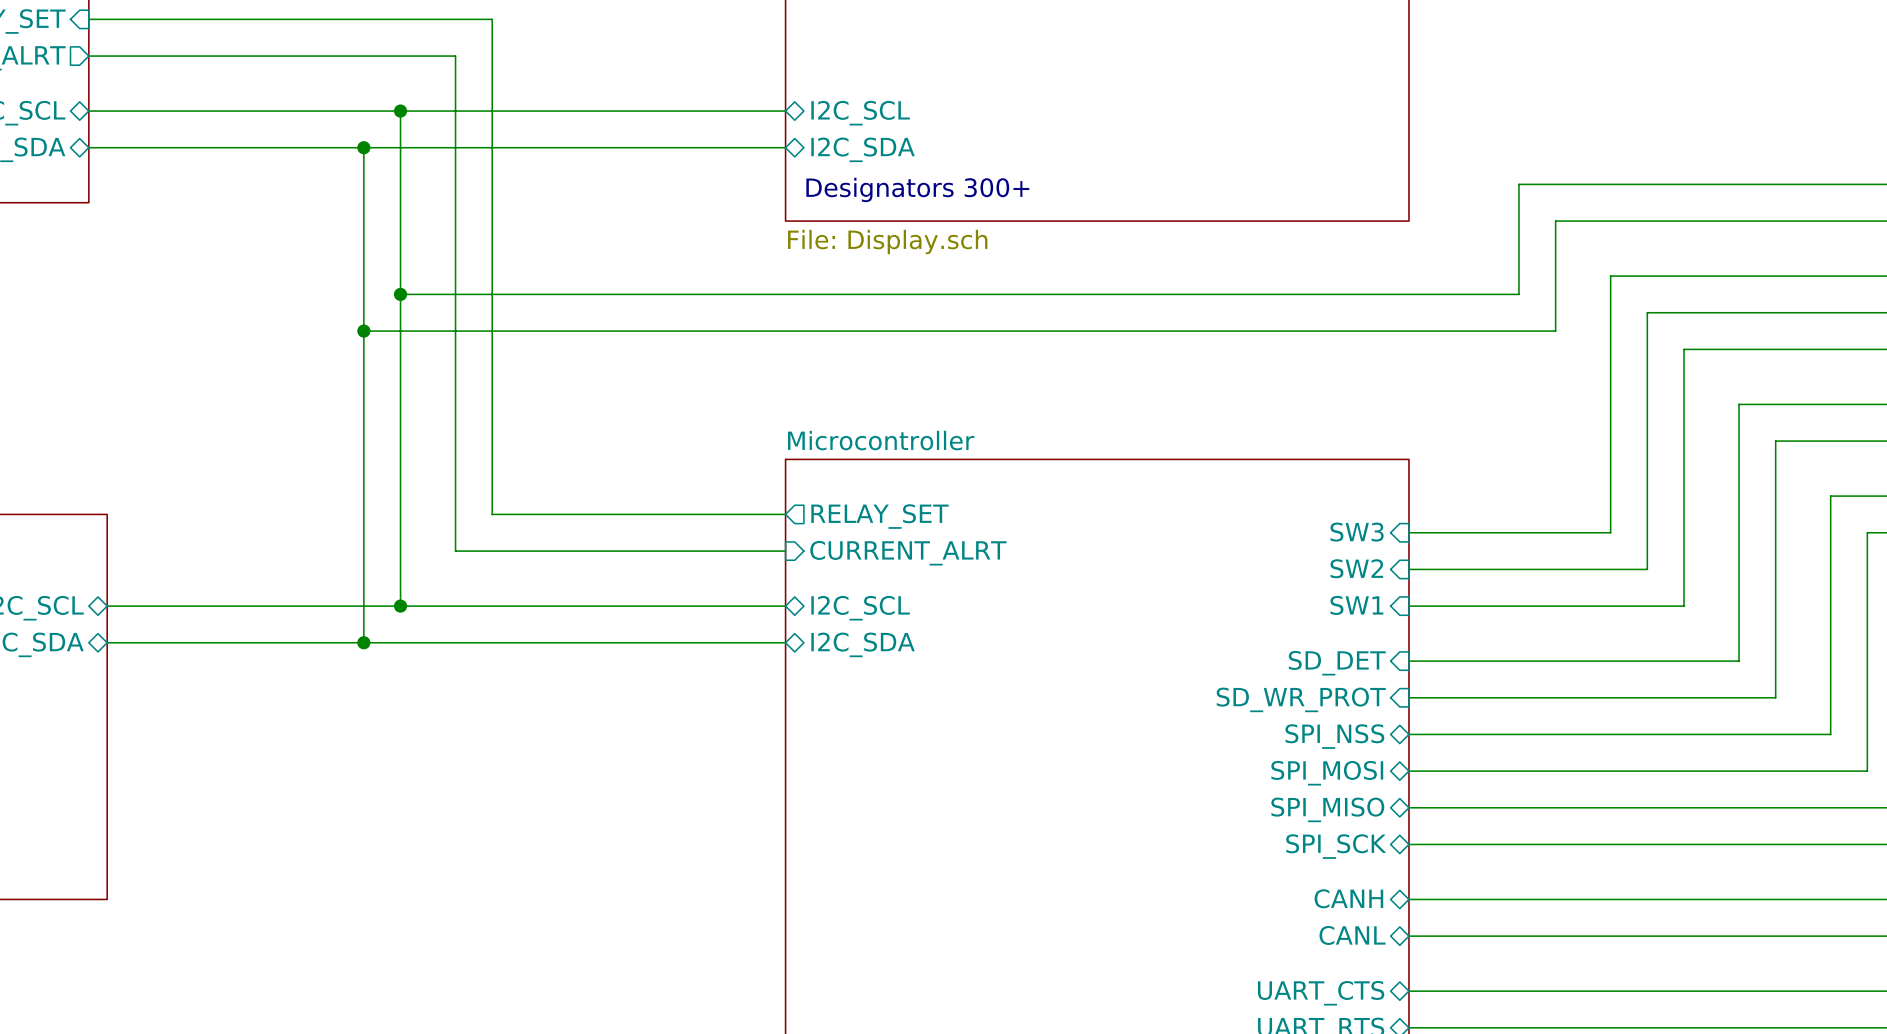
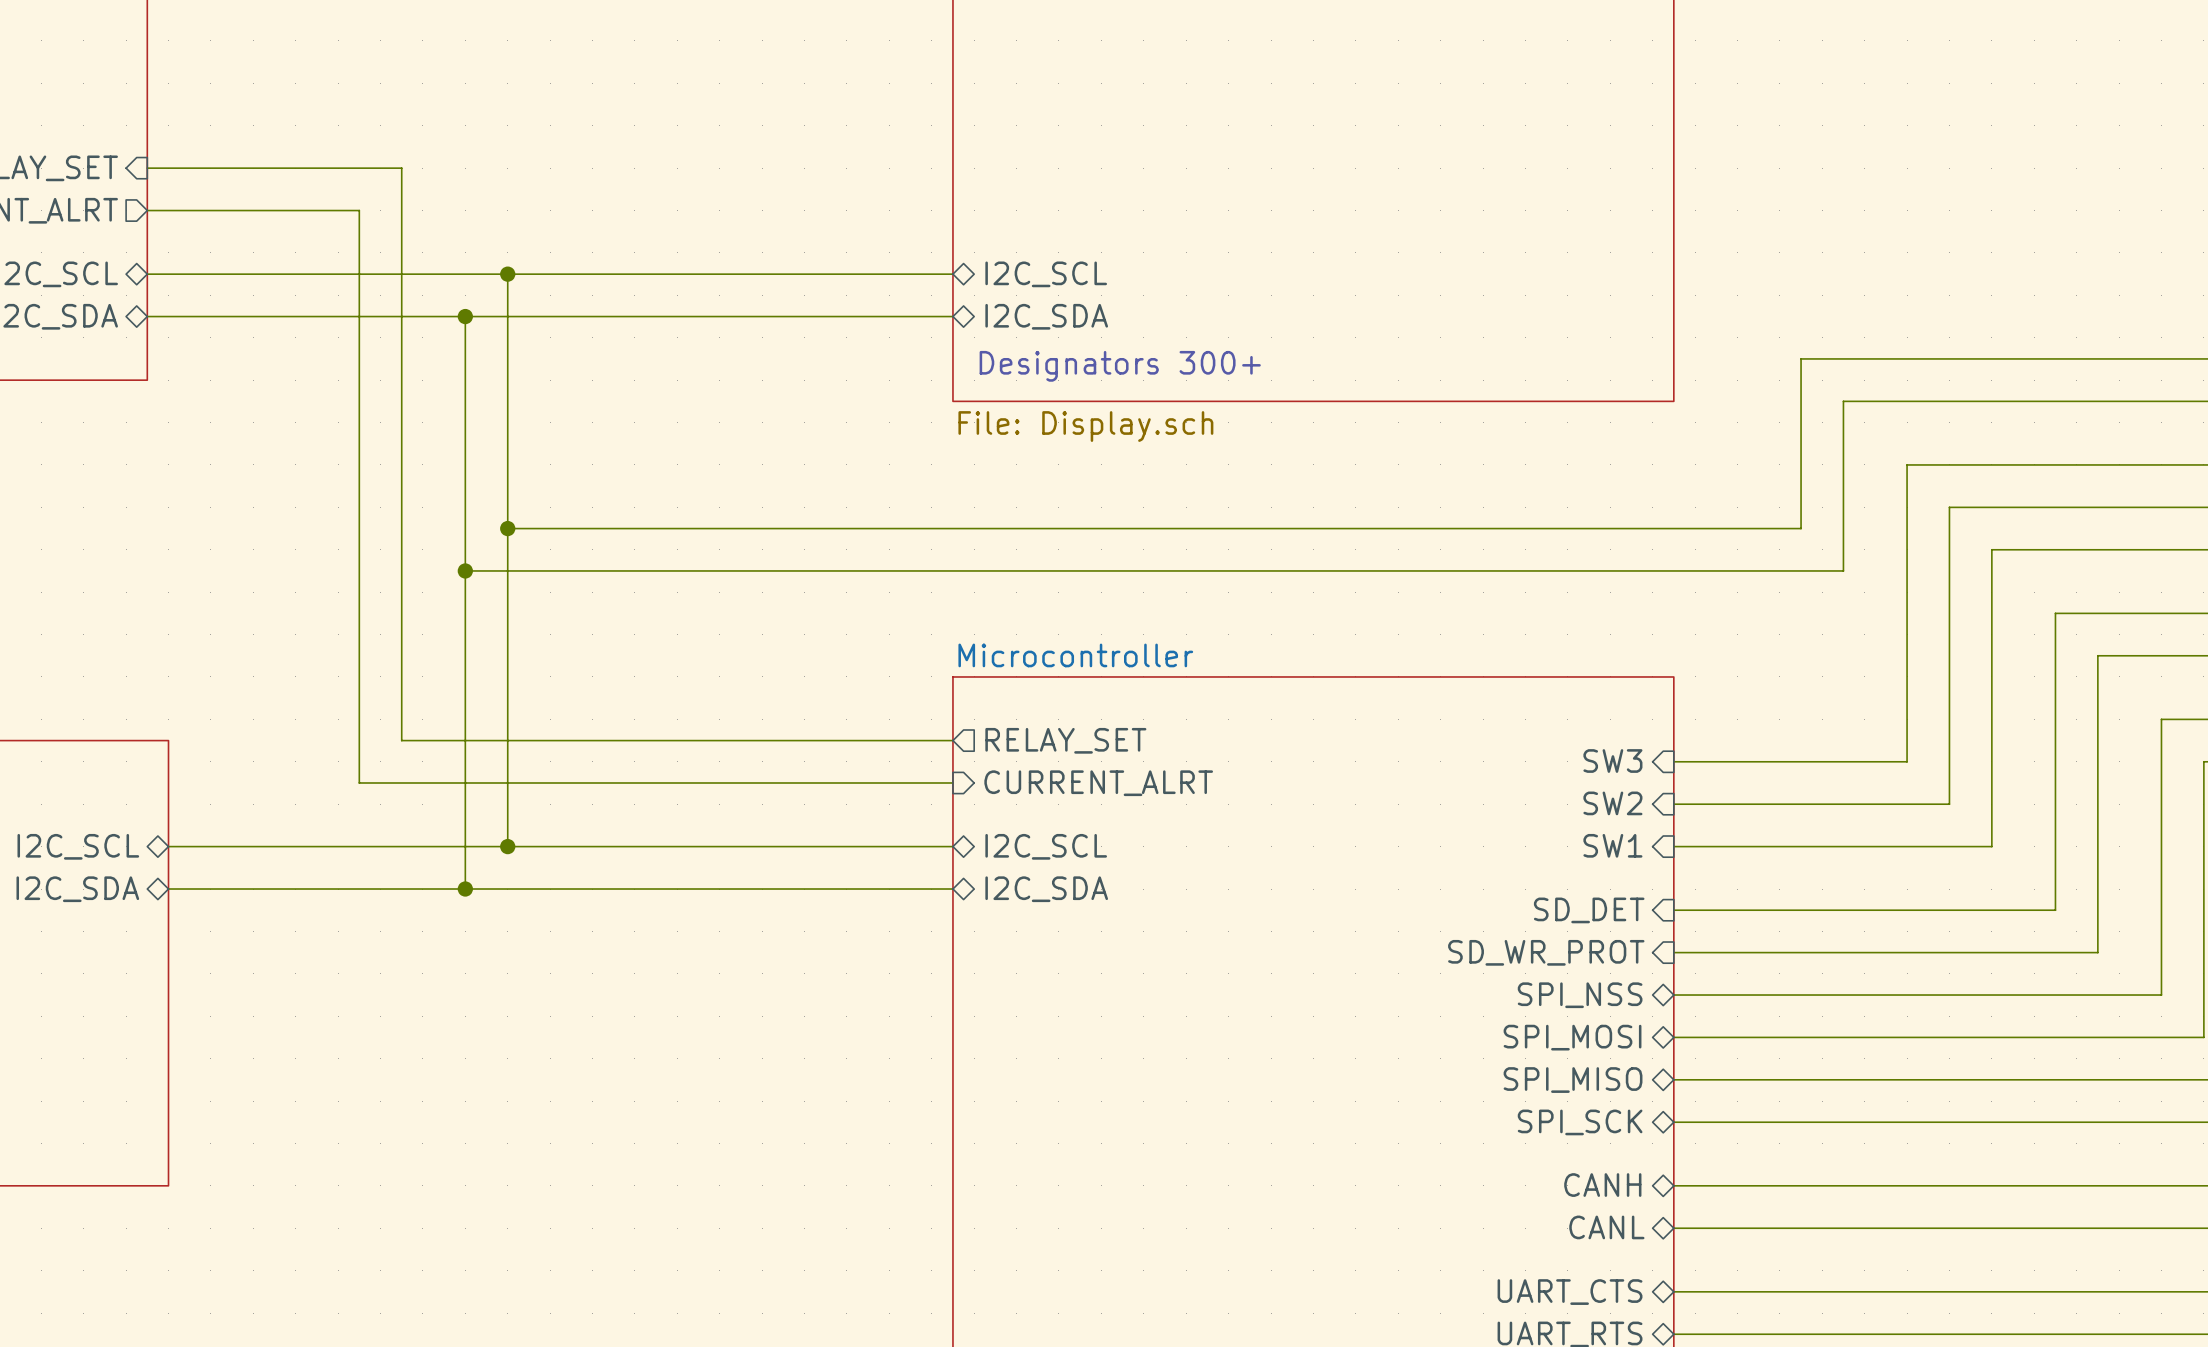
wire: (308, 19) (492, 19) (492, 514) -> (401, 168) (401, 740) (613, 740)
wire: (272, 56) (455, 56) (455, 551) -> (359, 210) (359, 782) (571, 782)
wire: (400, 294) (1518, 294) -> none
junction: (400, 294) -> none
wire: (363, 331) (400, 331) -> none
junction: (363, 331) -> none
junction: none -> (507, 528)
wire: (1518, 331) (1555, 331) -> (1801, 528) (1801, 486)
wire: none -> (1843, 528) (1843, 570) (465, 570)
junction: none -> (465, 570)

